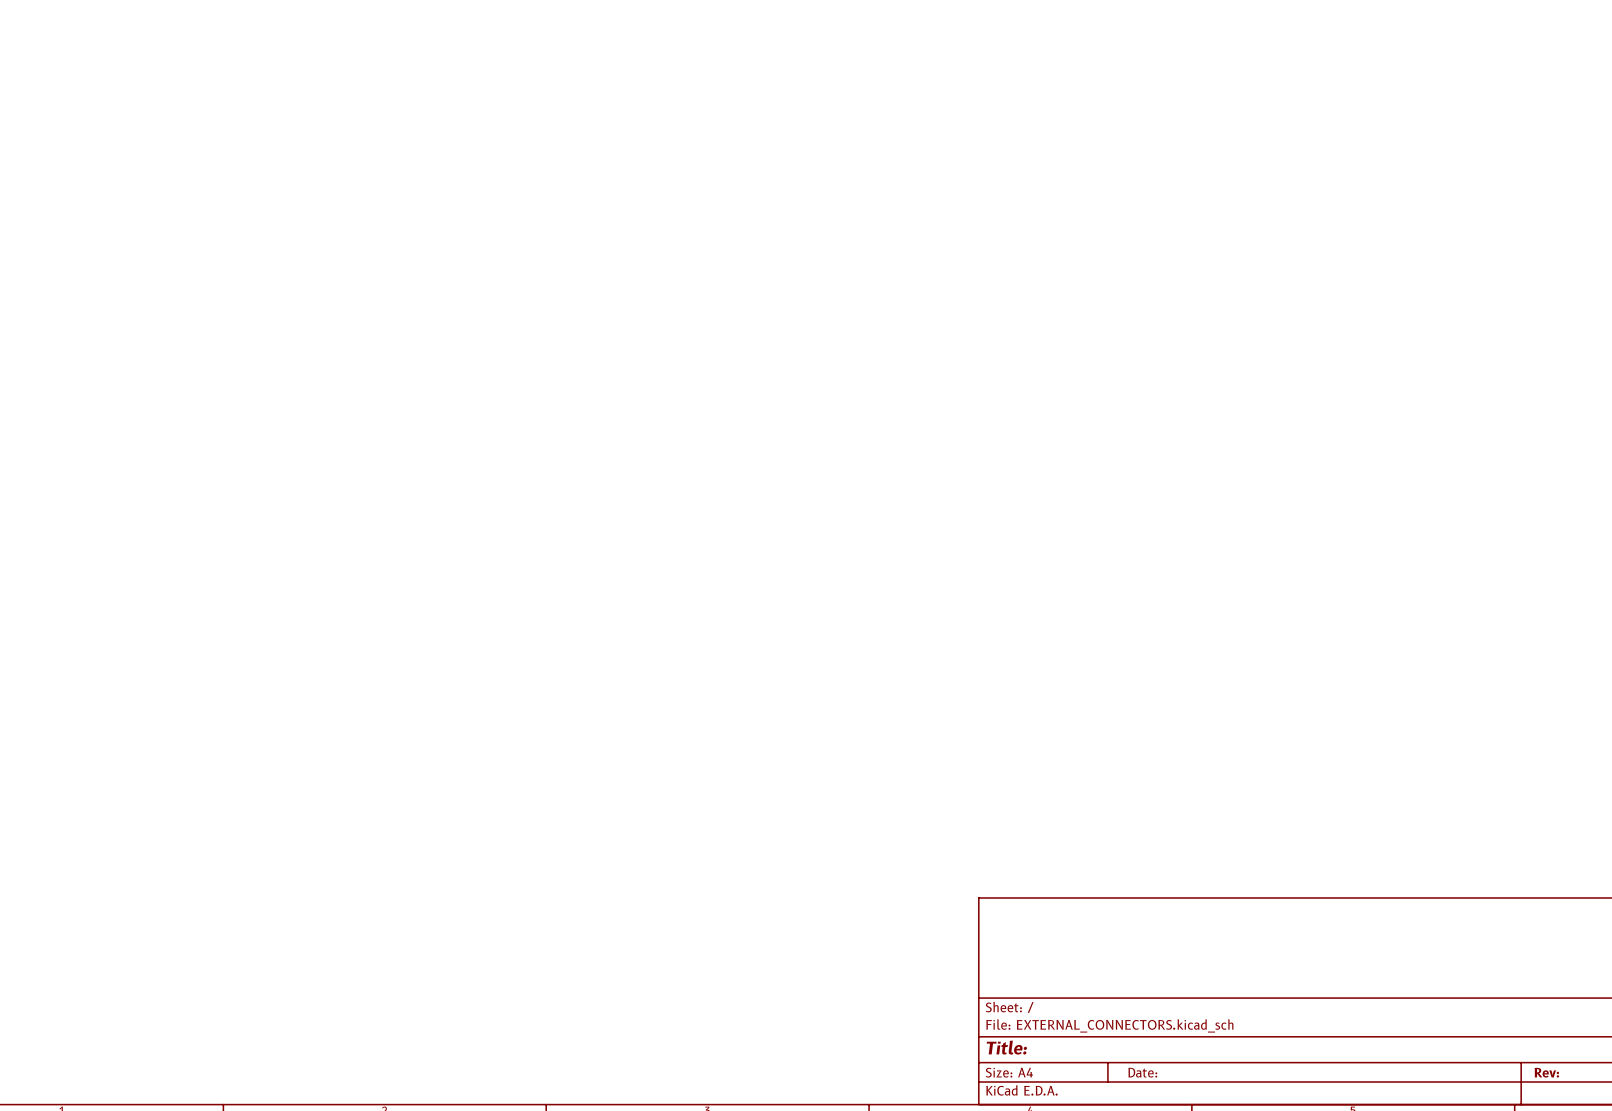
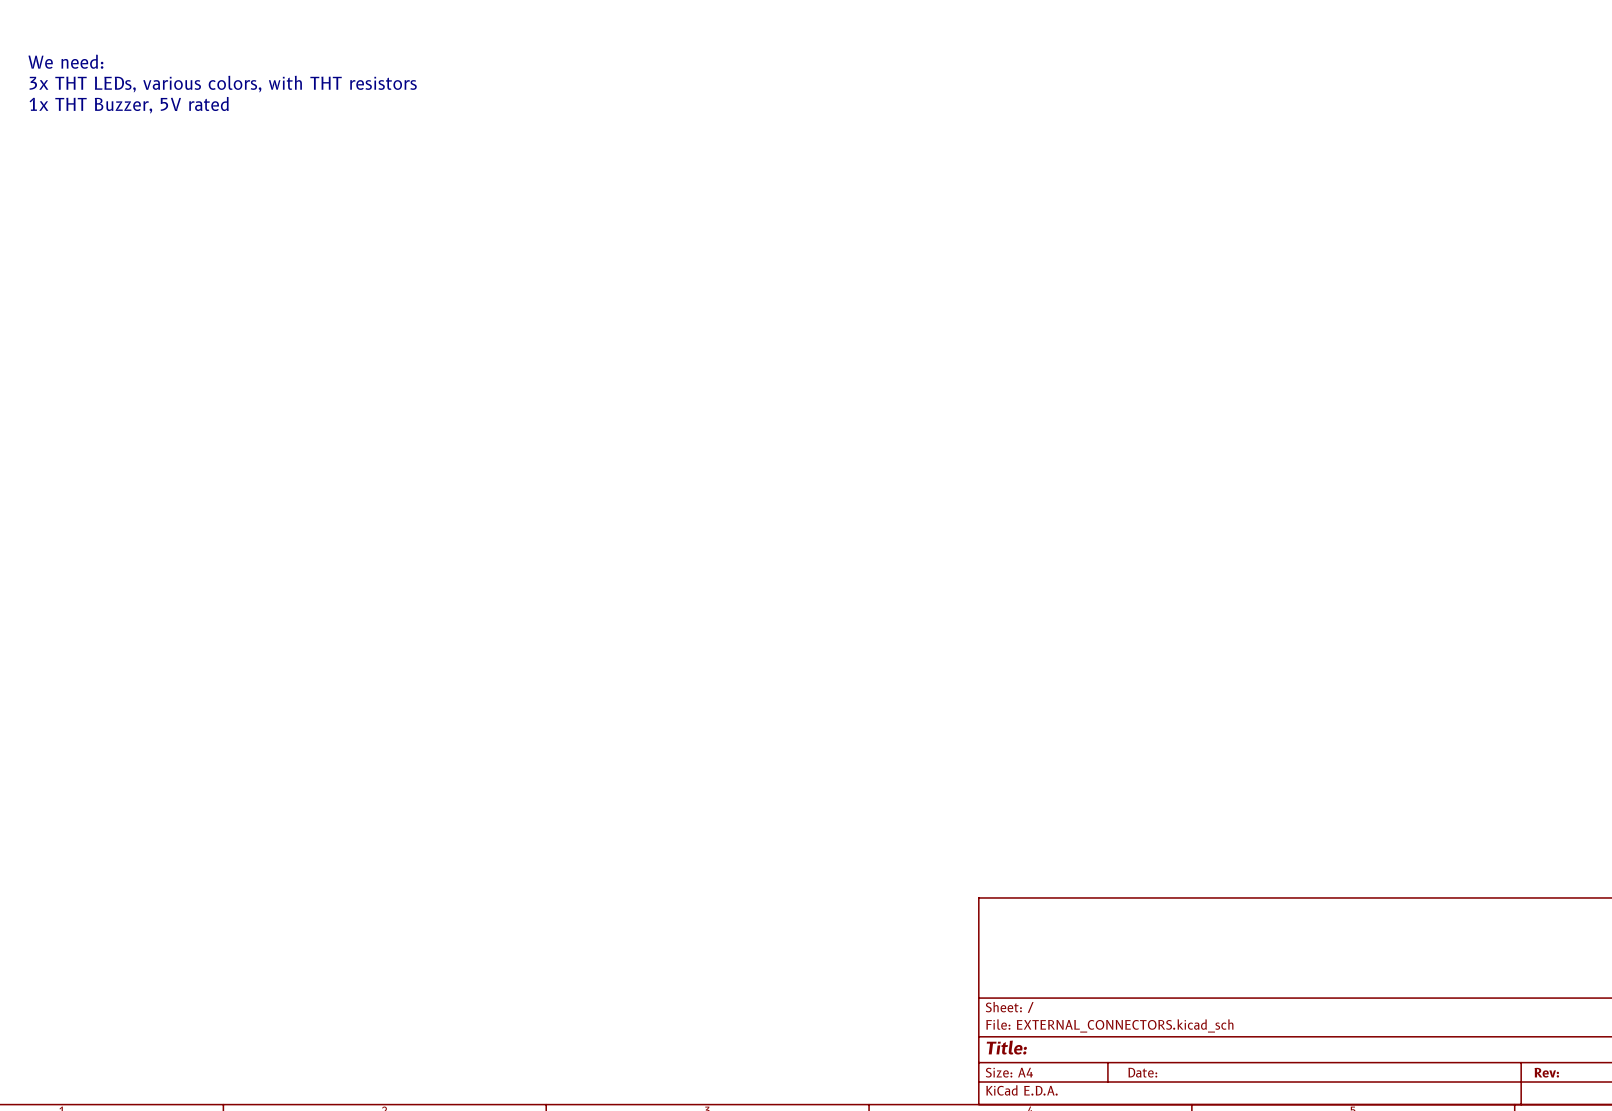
text: none -> We need: (65, 61)
text: none -> 3x THT LEDs, various colors, with THT resistors (223, 84)
text: none -> 1x THT Buzzer, 5V rated (129, 105)

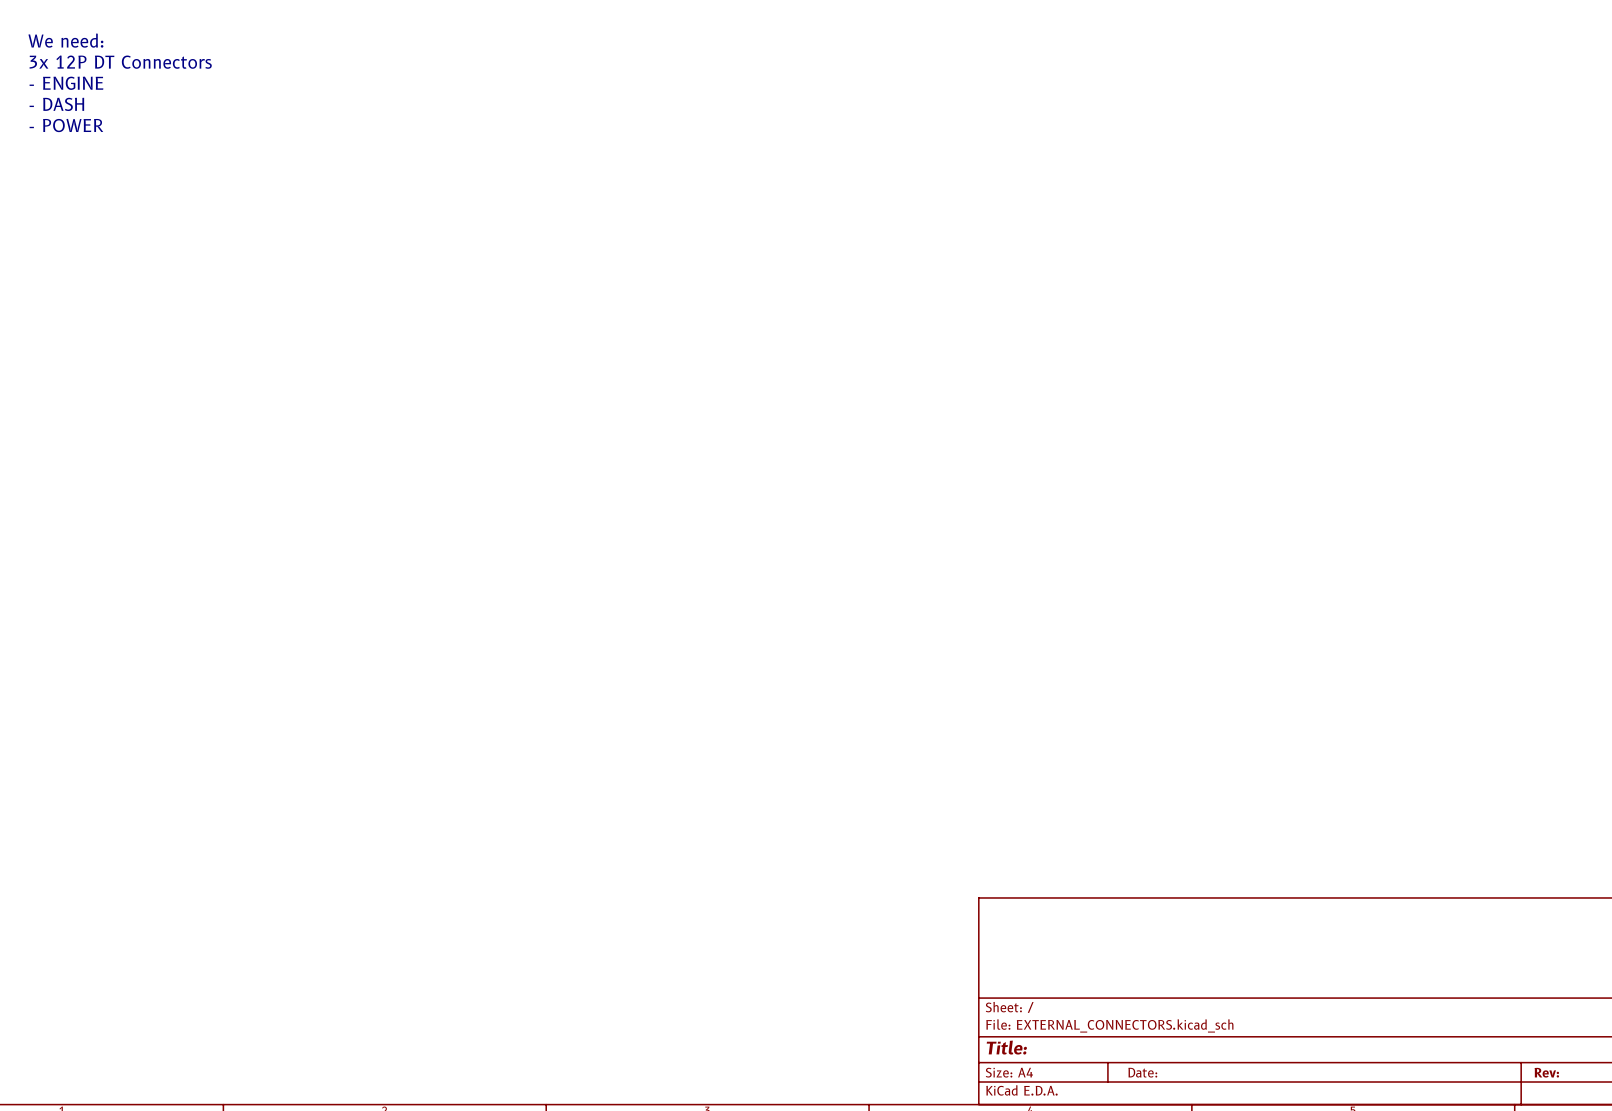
text: none -> We need: (65, 40)
text: We need: (65, 61) -> 3x 12P DT Connectors (120, 62)
text: 3x THT LEDs, various colors, with THT resistors (223, 84) -> - ENGINE (66, 83)
text: 1x THT Buzzer, 5V rated (129, 105) -> - DASH (56, 104)
text: none -> - POWER (66, 125)

